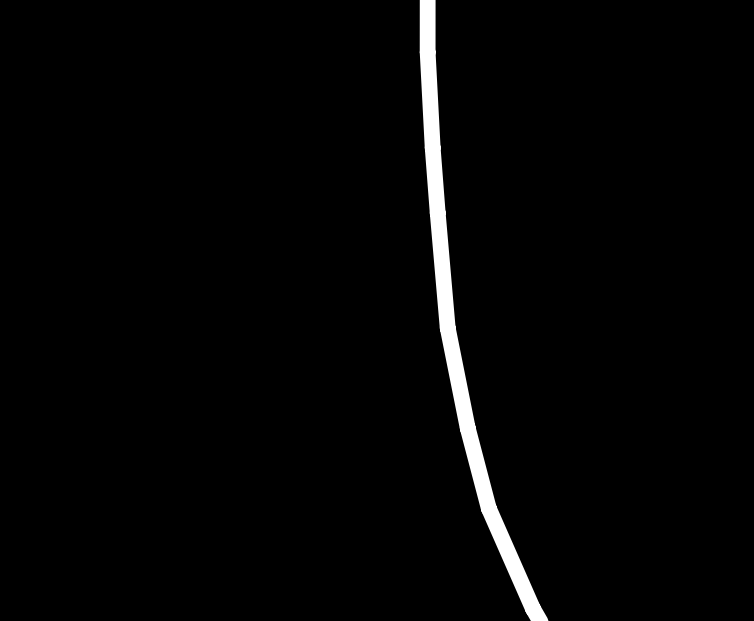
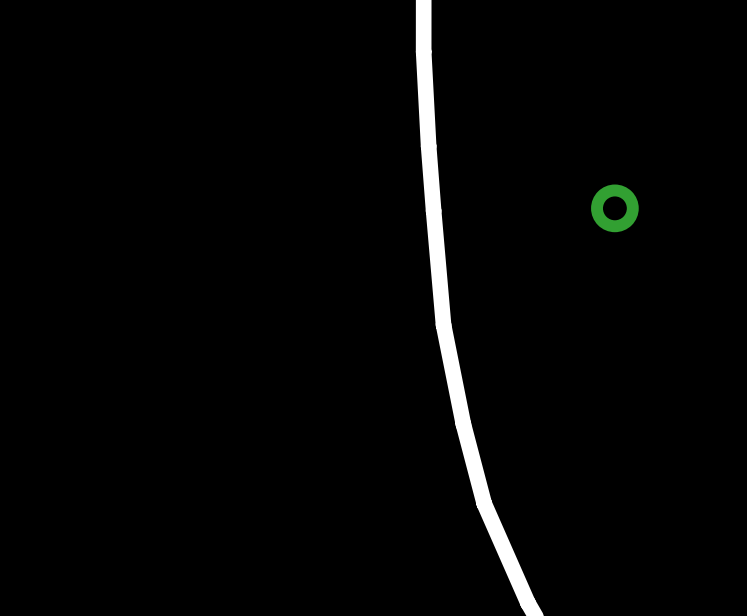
via: none -> (614, 208)

